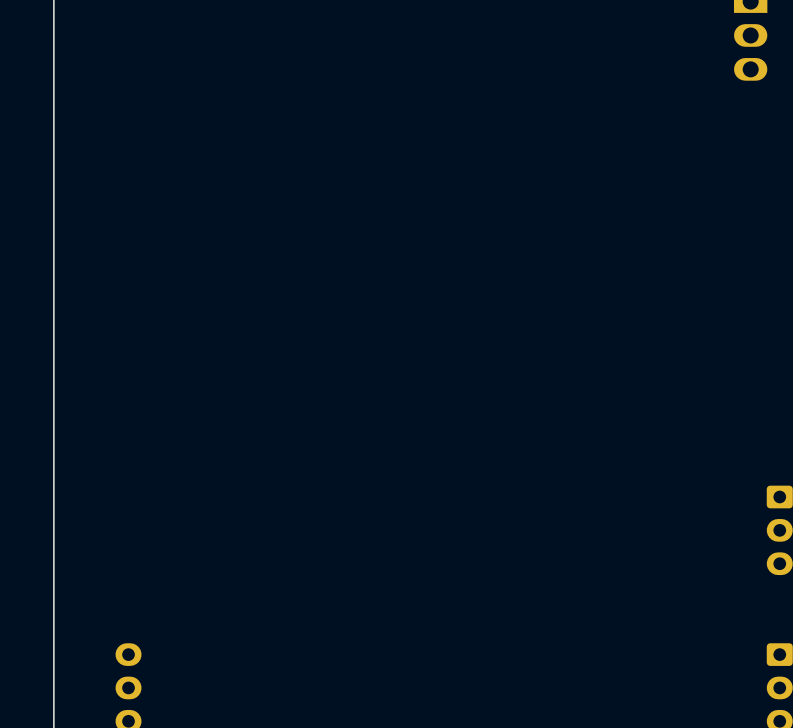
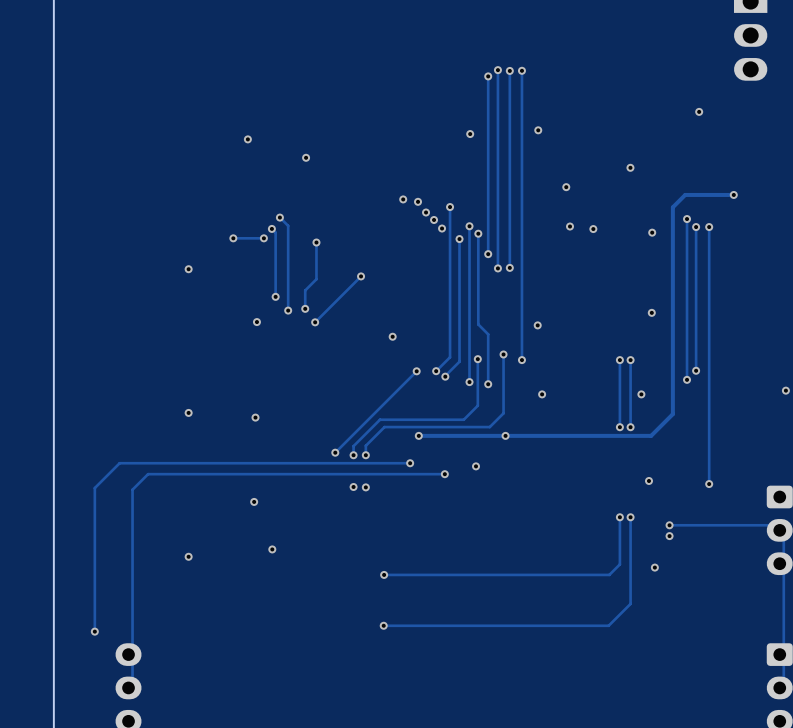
track: none -> (497, 70) (497, 268)
via: none -> (497, 70)
track: none -> (509, 70) (509, 267)
via: none -> (509, 70)
track: none -> (521, 70) (521, 360)
via: none -> (521, 70)
track: none -> (488, 76) (488, 254)
via: none -> (488, 76)
via: none -> (699, 111)
via: none -> (538, 130)
via: none -> (470, 134)
via: none -> (247, 139)
via: none -> (306, 157)
via: none -> (630, 167)
via: none -> (566, 187)
track: none -> (733, 194) (685, 194) (672, 207) (672, 414) (651, 435) (418, 435)
via: none -> (733, 194)
via: none -> (403, 199)
via: none -> (418, 201)
track: none -> (450, 207) (450, 357) (436, 371)
via: none -> (450, 207)
via: none -> (426, 212)
track: none -> (279, 217) (288, 225) (288, 310)
via: none -> (279, 217)
via: none -> (434, 219)
track: none -> (687, 219) (687, 379)
via: none -> (687, 219)
track: none -> (469, 226) (469, 382)
via: none -> (469, 226)
via: none -> (570, 226)
track: none -> (696, 227) (696, 370)
via: none -> (696, 227)
track: none -> (709, 227) (709, 484)
via: none -> (709, 227)
track: none -> (271, 228) (275, 232) (275, 296)
via: none -> (271, 228)
via: none -> (442, 228)
via: none -> (593, 229)
via: none -> (652, 232)
track: none -> (478, 233) (478, 324) (488, 334) (488, 384)
via: none -> (478, 233)
via: none -> (233, 238)
track: none -> (263, 238) (233, 238)
via: none -> (263, 238)
track: none -> (459, 239) (459, 361) (445, 376)
via: none -> (459, 239)
track: none -> (316, 242) (316, 279) (305, 290) (305, 308)
via: none -> (316, 242)
via: none -> (488, 254)
via: none -> (509, 267)
via: none -> (497, 268)
via: none -> (188, 269)
track: none -> (361, 276) (315, 322)
via: none -> (361, 276)
via: none -> (275, 296)
via: none -> (305, 308)
via: none -> (288, 310)
via: none -> (651, 312)
via: none -> (256, 322)
via: none -> (315, 322)
via: none -> (537, 325)
via: none -> (392, 336)
track: none -> (503, 354) (503, 413) (489, 427) (384, 427) (365, 445) (365, 455)
via: none -> (503, 354)
track: none -> (477, 359) (477, 405) (463, 419) (379, 419) (353, 446) (353, 455)
via: none -> (477, 359)
via: none -> (521, 360)
track: none -> (619, 360) (619, 427)
via: none -> (619, 360)
track: none -> (630, 360) (630, 427)
via: none -> (630, 360)
via: none -> (696, 370)
track: none -> (416, 371) (335, 452)
via: none -> (416, 371)
via: none -> (436, 371)
via: none -> (445, 376)
via: none -> (687, 379)
via: none -> (469, 382)
via: none -> (488, 384)
via: none -> (785, 390)
via: none -> (542, 394)
via: none -> (641, 394)
via: none -> (188, 412)
via: none -> (255, 417)
via: none -> (619, 427)
via: none -> (630, 427)
via: none -> (418, 435)
via: none -> (505, 435)
via: none -> (335, 452)
via: none -> (353, 455)
via: none -> (365, 455)
track: none -> (410, 463) (119, 463) (94, 488) (94, 631)
via: none -> (410, 463)
via: none -> (476, 466)
track: none -> (444, 474) (148, 474) (132, 489) (132, 677)
via: none -> (444, 474)
via: none -> (649, 480)
via: none -> (709, 484)
via: none -> (353, 486)
via: none -> (365, 487)
via: none -> (254, 501)
track: none -> (619, 517) (619, 564) (609, 574) (384, 574)
via: none -> (619, 517)
track: none -> (630, 517) (630, 603) (608, 625) (383, 625)
via: none -> (630, 517)
track: none -> (669, 525) (772, 525) (783, 536) (783, 677)
via: none -> (669, 525)
via: none -> (669, 536)
via: none -> (272, 549)
via: none -> (188, 556)
via: none -> (654, 567)
via: none -> (384, 574)
via: none -> (383, 625)
via: none -> (94, 631)

